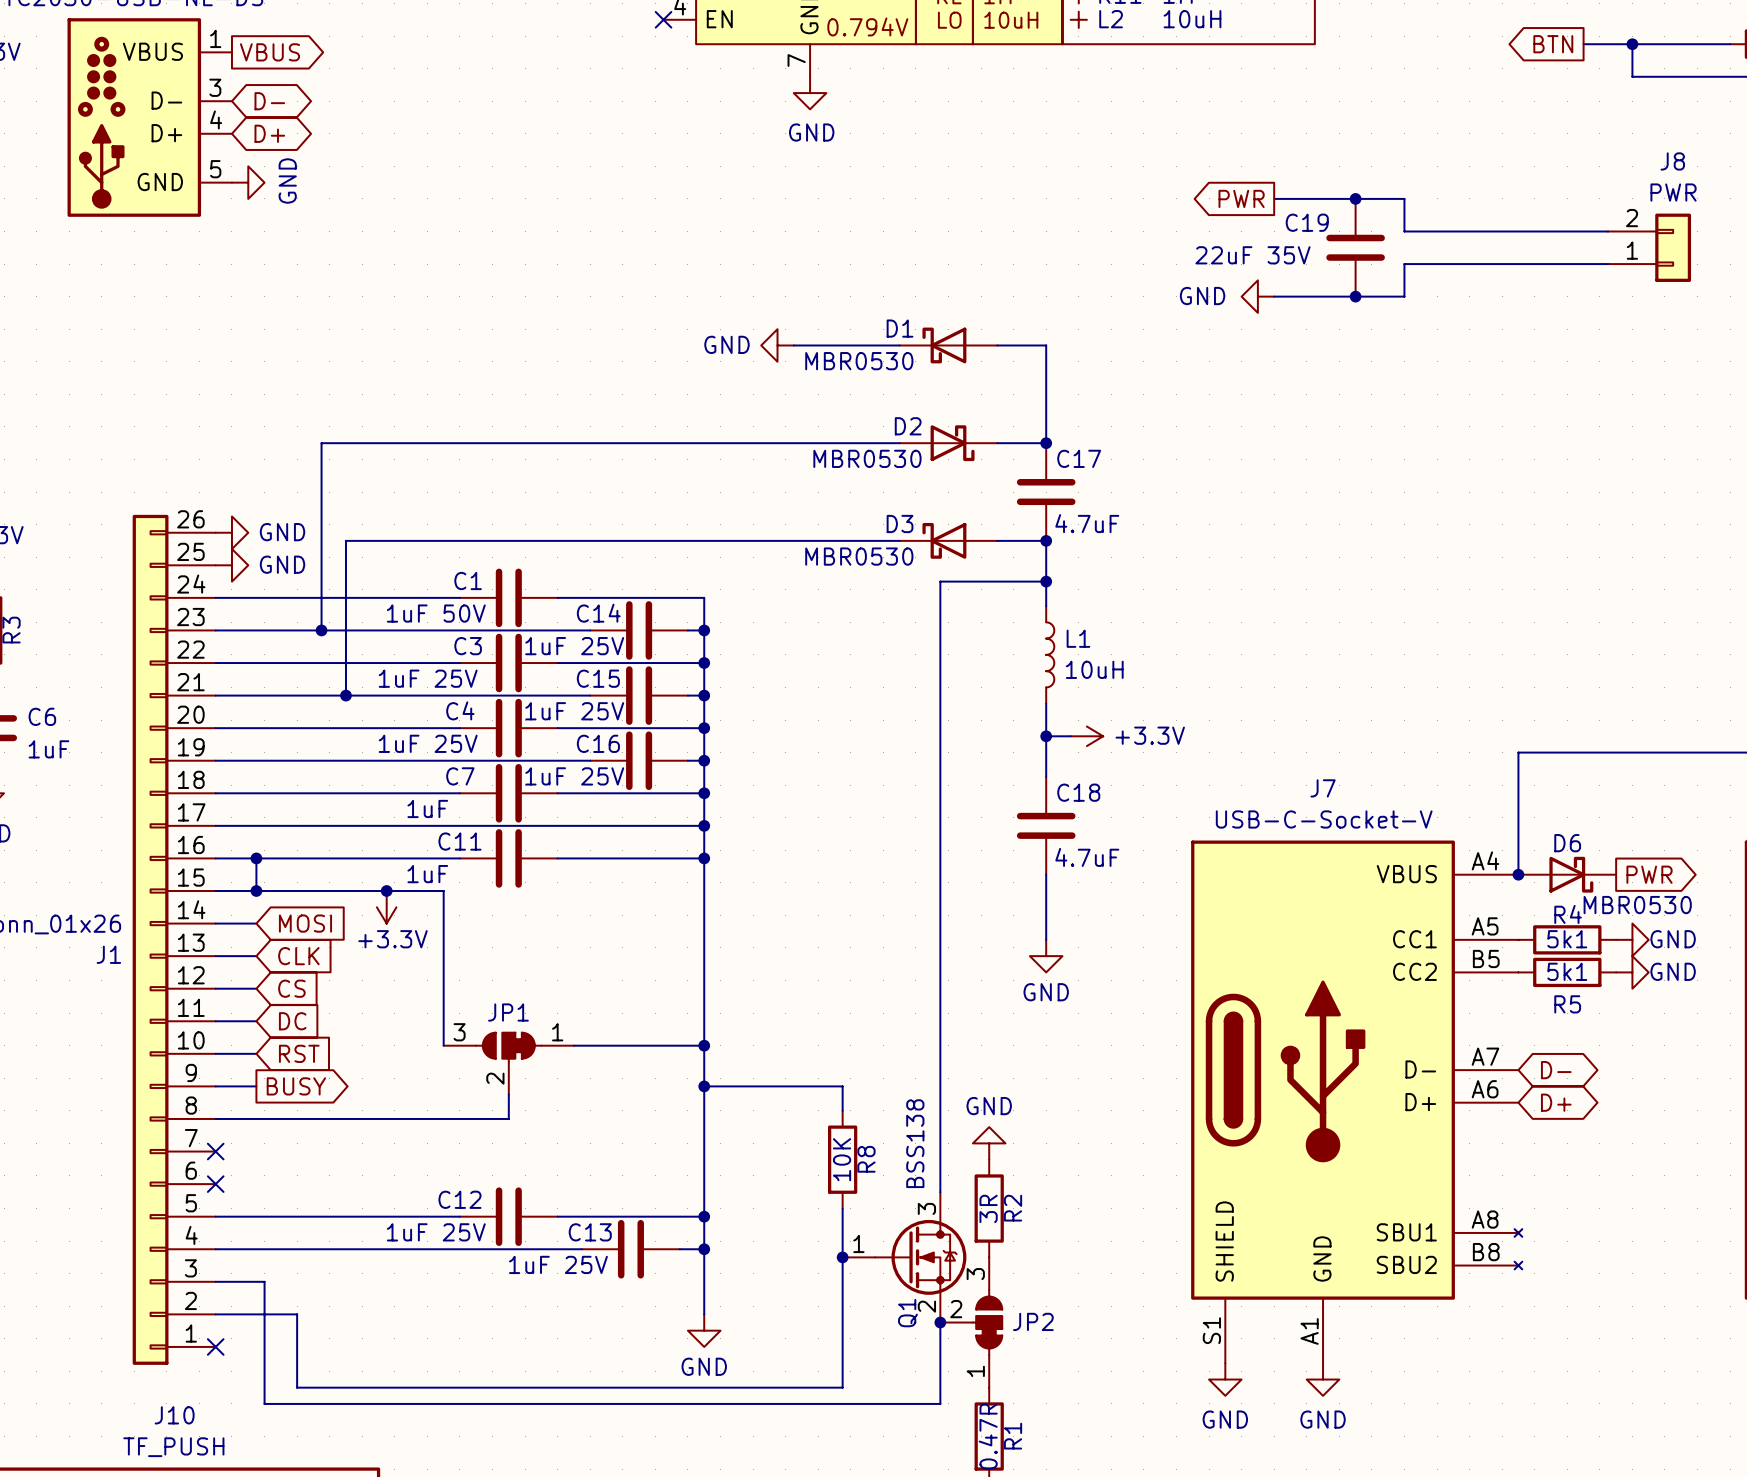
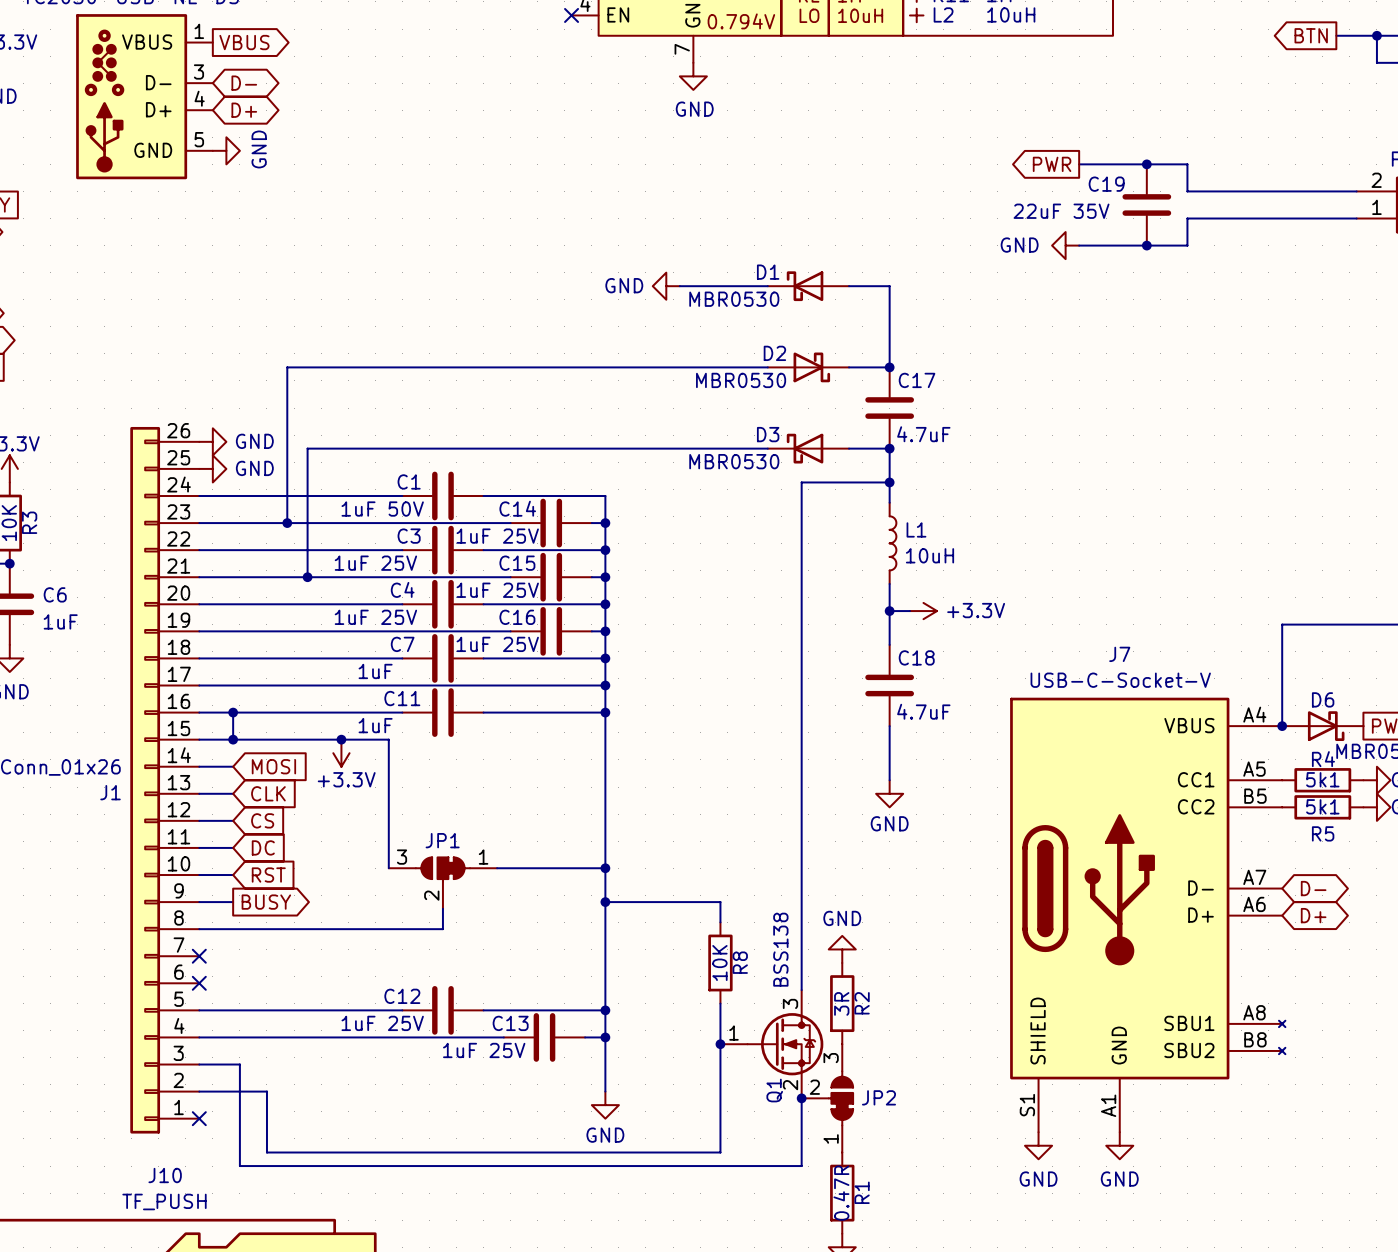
part symbol: [67, 18, 232, 217] -> [76, 14, 213, 180]

